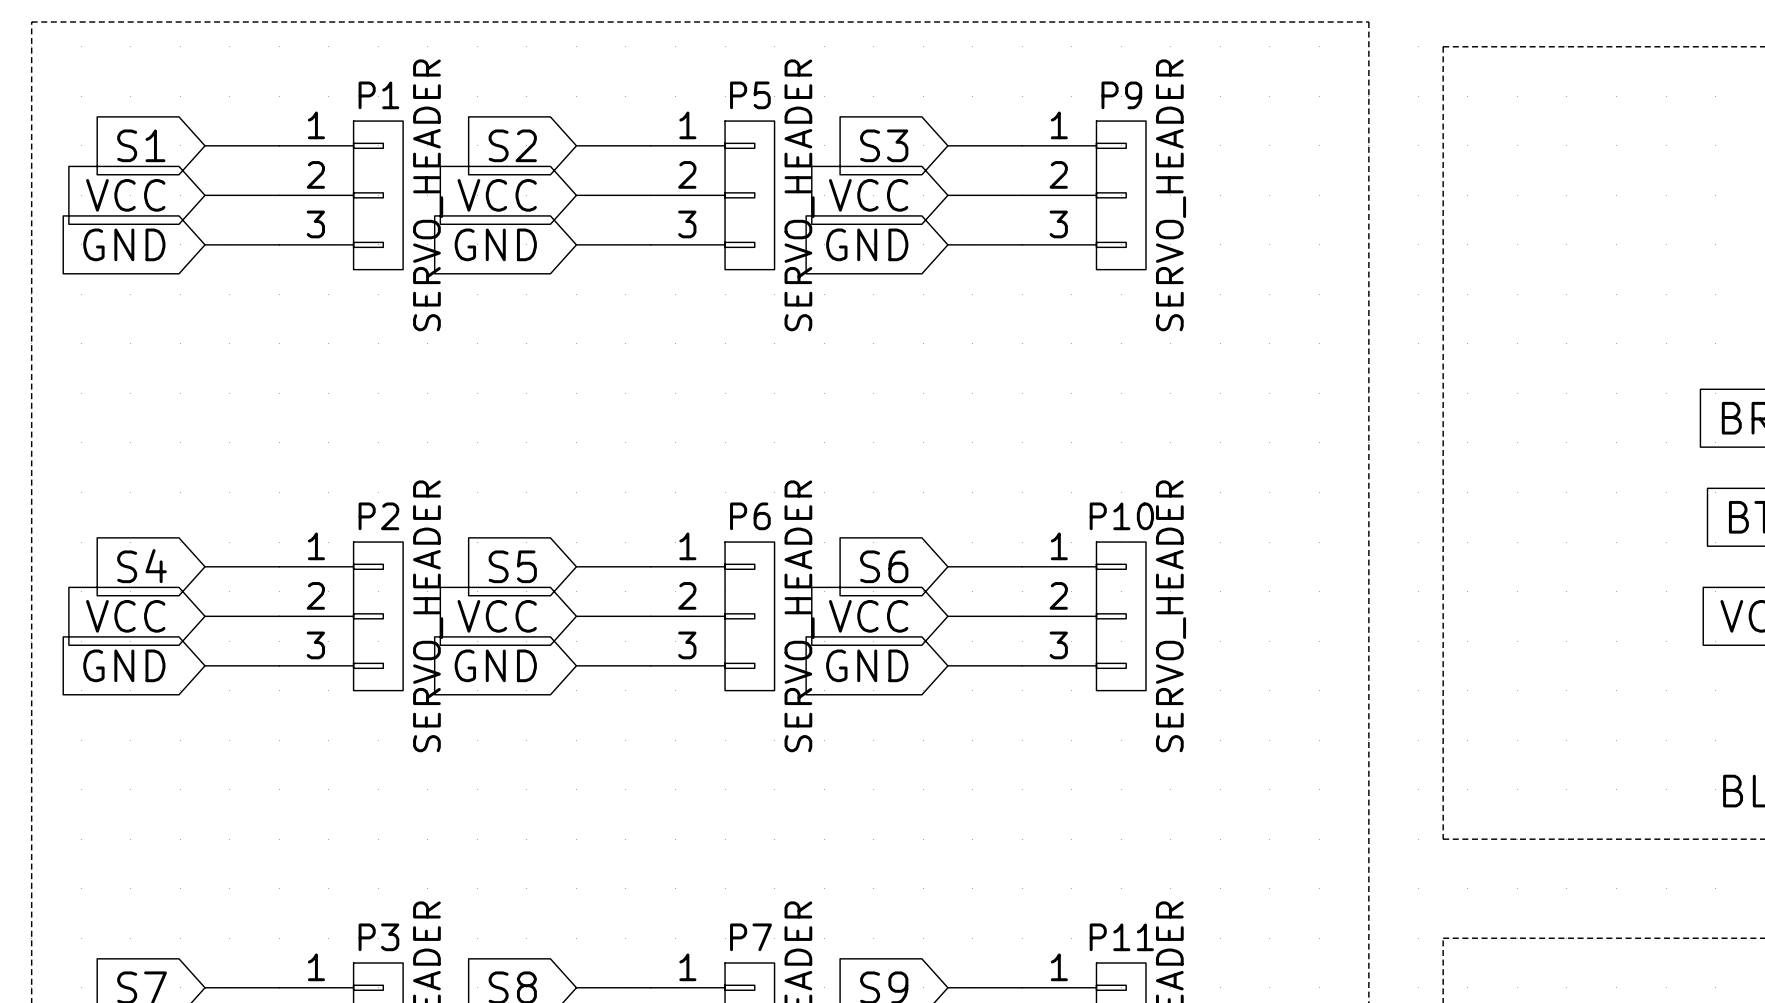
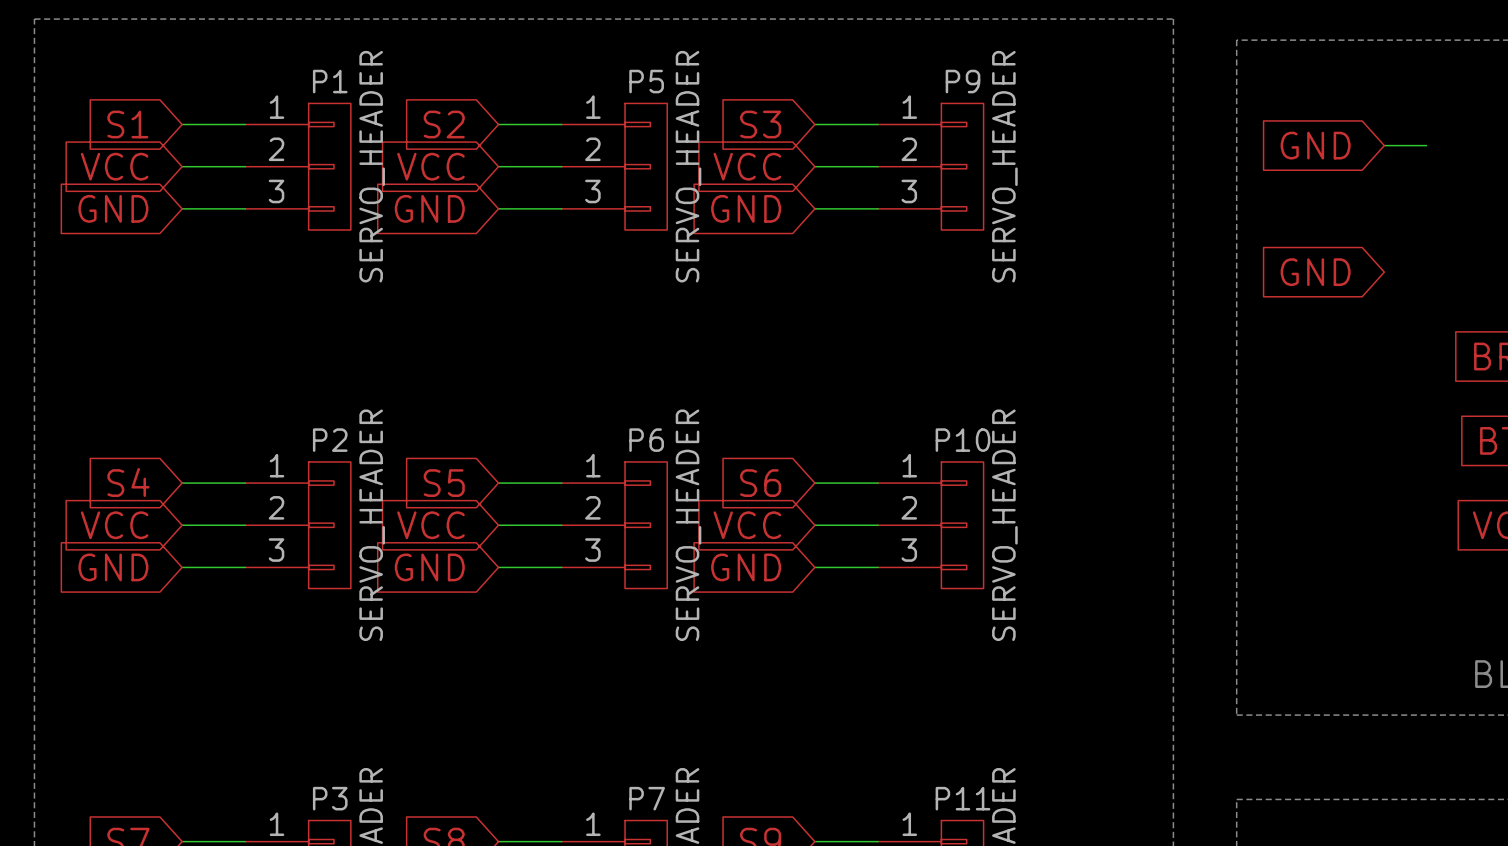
global label: none -> GND (1315, 145)
wire: none -> (1384, 145) (1426, 145)
global label: none -> GND (1315, 272)

